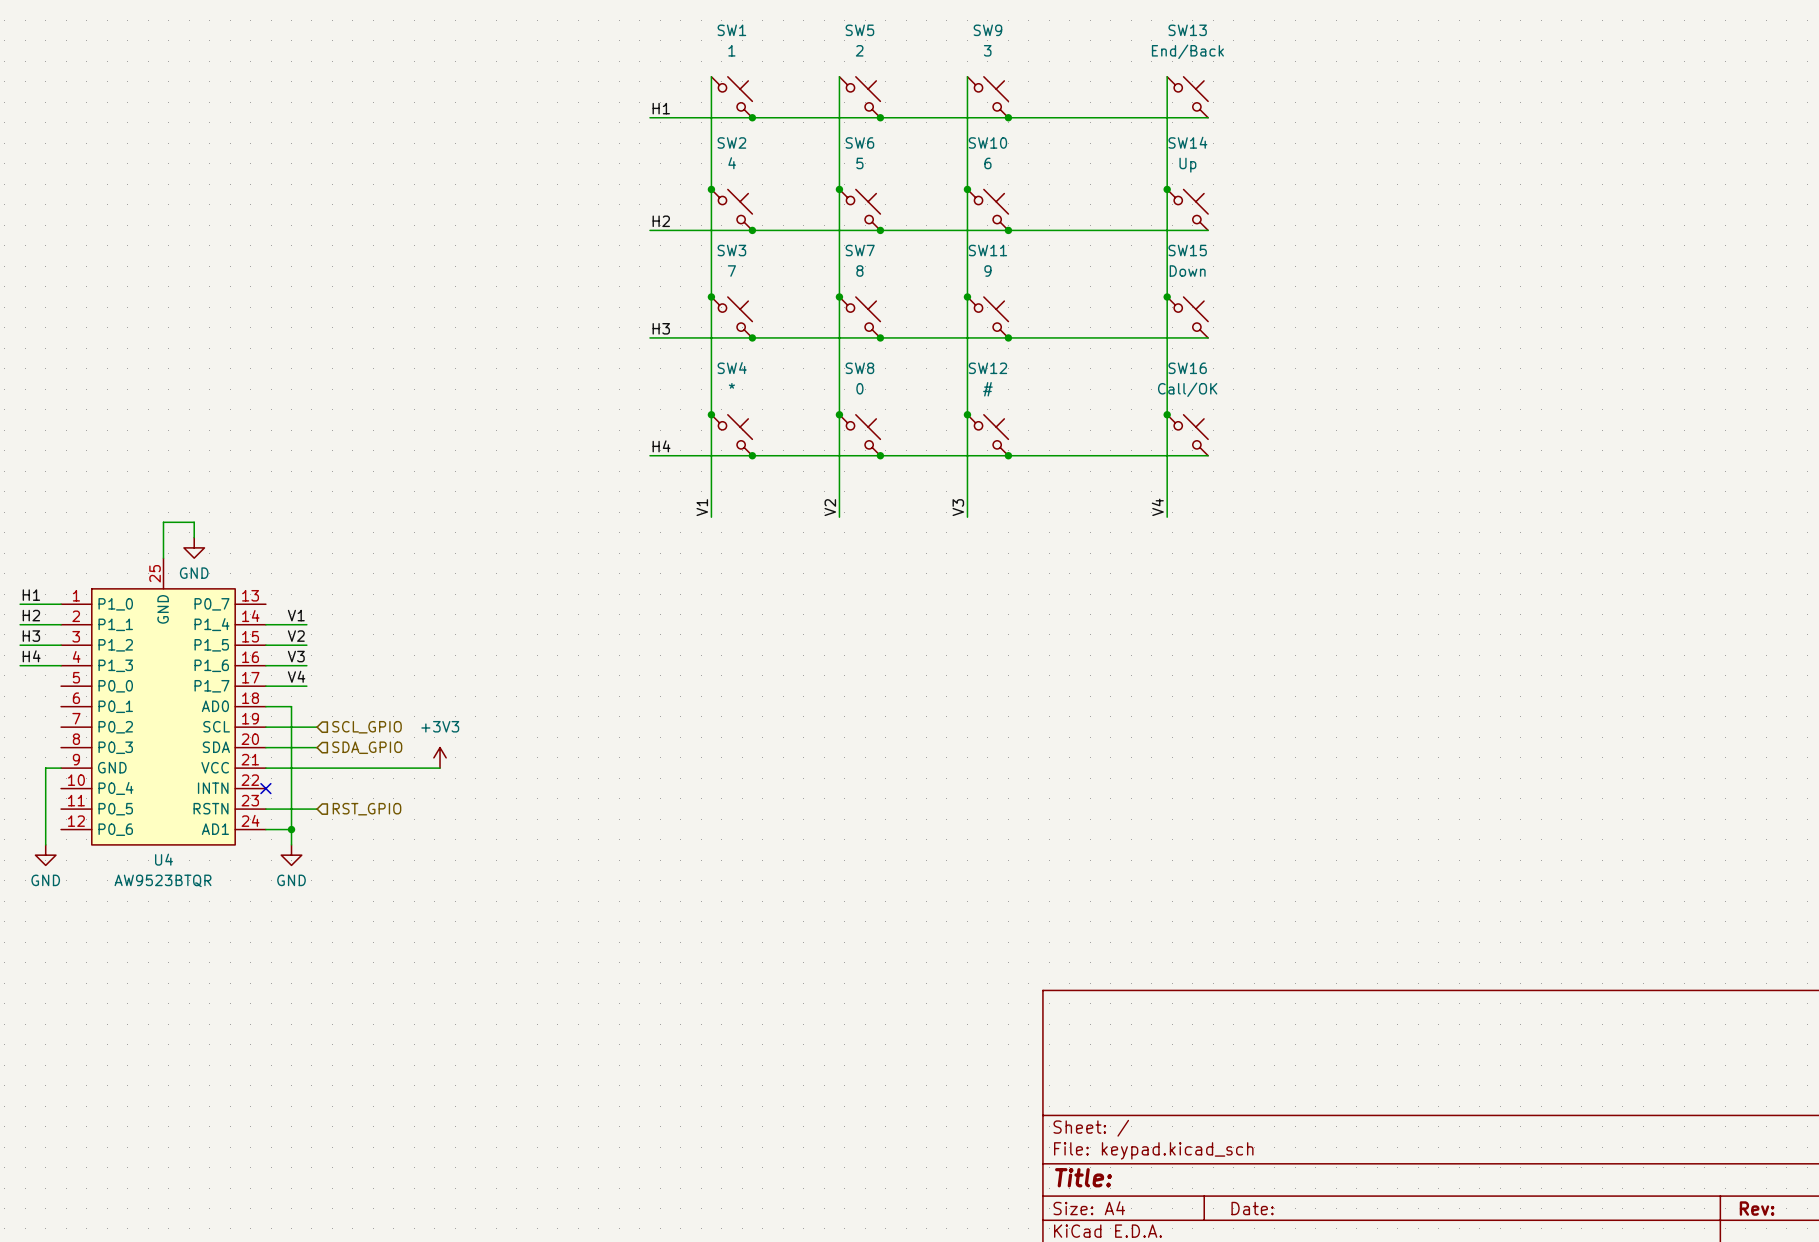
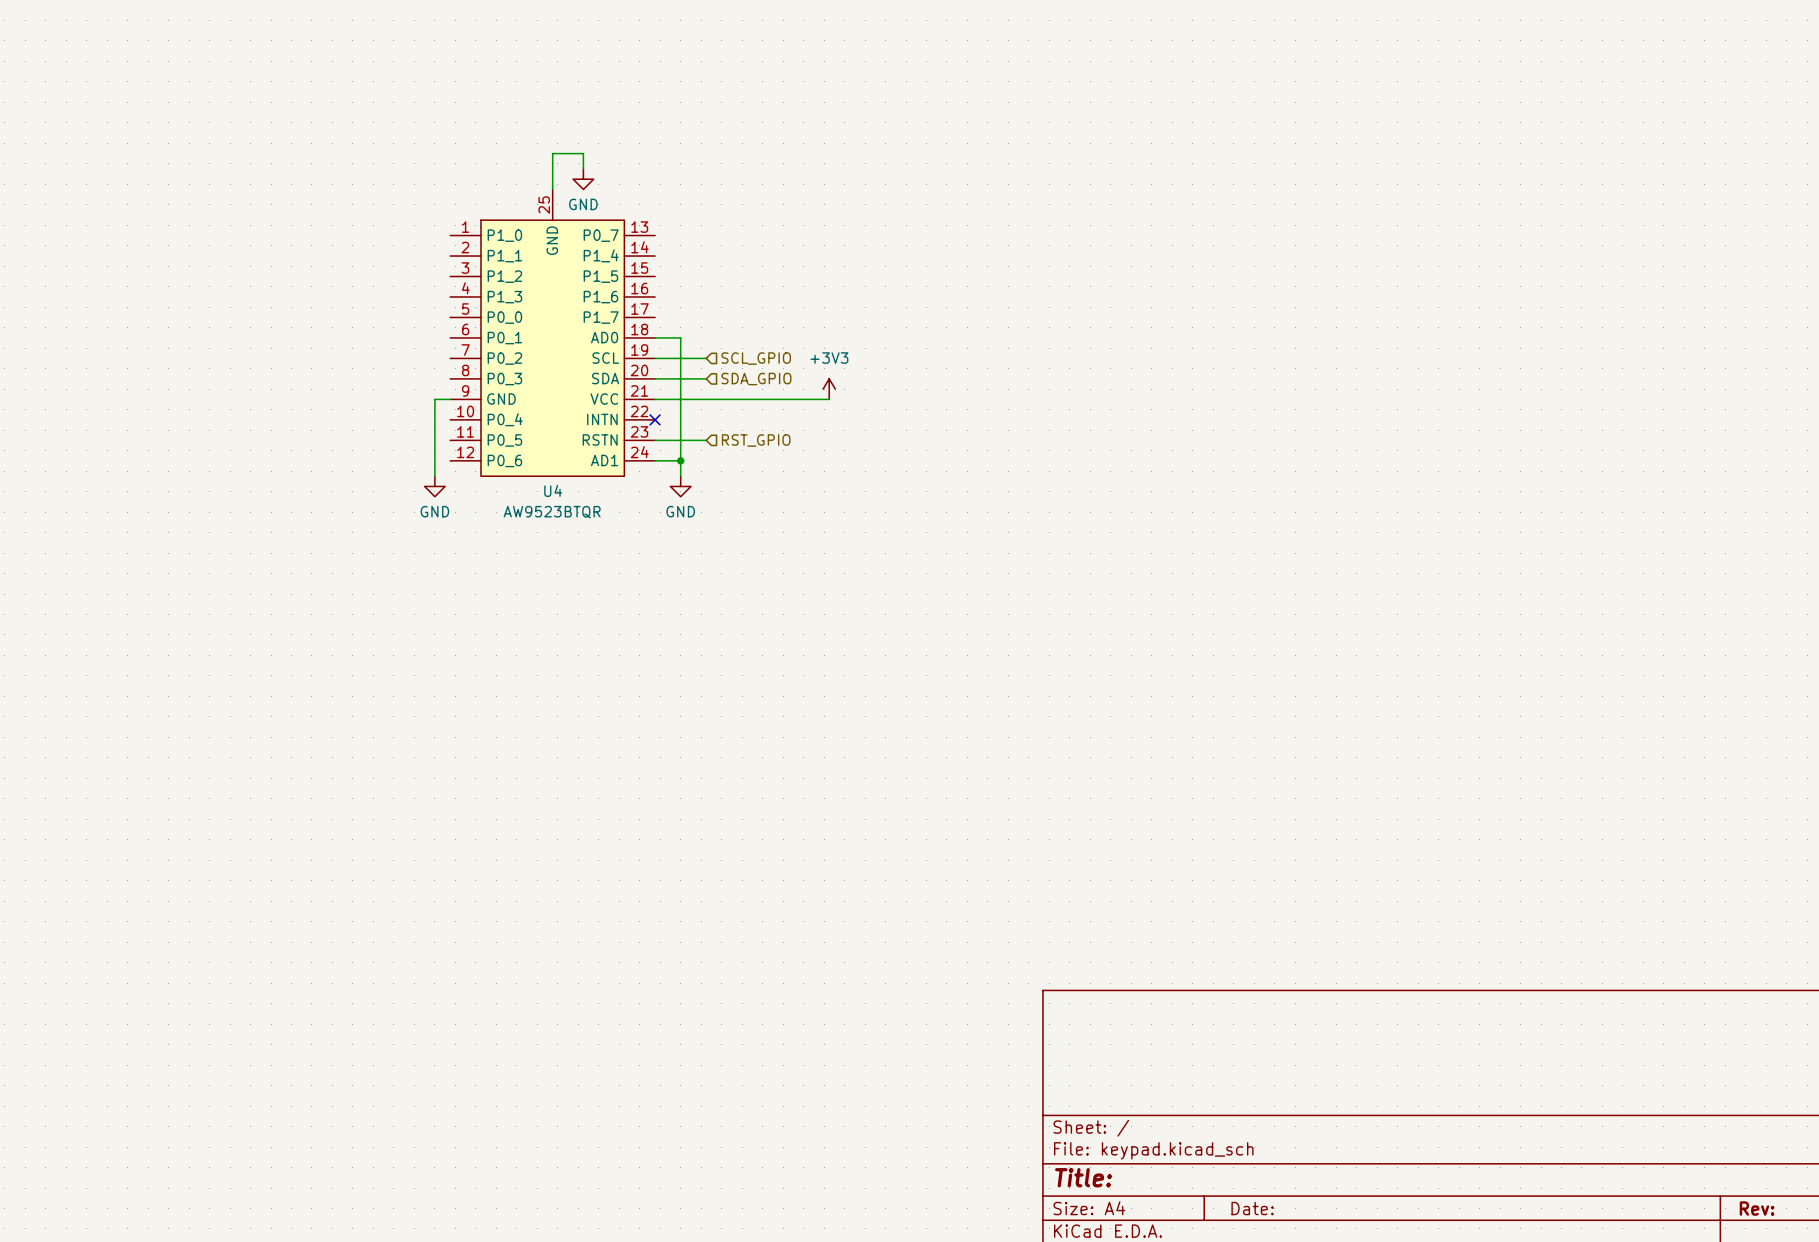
wire: (711, 76) (711, 517) -> none
wire: (839, 76) (839, 517) -> none
wire: (967, 76) (967, 517) -> none
wire: (1167, 76) (1167, 517) -> none
SW1: 1 (731, 97) -> none
SW5: 2 (859, 97) -> none
SW9: 3 (987, 97) -> none
SW13: End/Back (1187, 97) -> none
label: H1 (661, 108) -> none
wire: (649, 117) (1208, 117) -> none
junction: (752, 117) -> none
junction: (880, 117) -> none
junction: (1008, 117) -> none
wire: none -> (583, 168) (583, 153) (552, 153) (552, 189)
power symbol: none -> GND (583, 179)
junction: (711, 189) -> none
junction: (839, 189) -> none
junction: (967, 189) -> none
junction: (1167, 189) -> none
SW2: 4 (731, 209) -> none
SW6: 5 (859, 209) -> none
SW10: 6 (987, 209) -> none
SW14: Up (1187, 209) -> none
label: H2 (661, 221) -> none
wire: (649, 230) (1208, 230) -> none
junction: (752, 230) -> none
junction: (880, 230) -> none
junction: (1008, 230) -> none
junction: (711, 296) -> none
junction: (839, 296) -> none
junction: (967, 296) -> none
junction: (1167, 296) -> none
SW3: 7 (731, 317) -> none
SW7: 8 (859, 317) -> none
SW11: 9 (987, 317) -> none
SW15: Down (1187, 317) -> none
label: H3 (661, 328) -> none
wire: (680, 337) (1208, 337) -> (680, 337) (680, 476)
junction: (752, 337) -> none
junction: (880, 337) -> none
junction: (1008, 337) -> none
wire: none -> (655, 358) (706, 358)
hierarchical label: none -> SCL_GPIO (756, 358)
wire: none -> (655, 378) (706, 378)
hierarchical label: none -> SDA_GPIO (756, 379)
power symbol: none -> +3V3 (829, 389)
wire: none -> (450, 399) (434, 399) (434, 476)
wire: none -> (655, 399) (829, 399)
junction: (711, 414) -> none
junction: (839, 414) -> none
junction: (967, 414) -> none
junction: (1167, 414) -> none
no-connect mark: none -> (655, 419)
SW4: * (731, 435) -> none
SW8: 0 (859, 435) -> none
SW12: # (987, 435) -> none
SW16: Call/OK (1187, 435) -> none
wire: none -> (655, 440) (706, 440)
hierarchical label: none -> RST_GPIO (756, 440)
label: H4 (661, 446) -> none
wire: (649, 455) (1208, 455) -> none
junction: (752, 455) -> none
junction: (880, 455) -> none
junction: (1008, 455) -> none
wire: none -> (655, 460) (680, 460)
junction: none -> (680, 460)
power symbol: none -> GND (434, 486)
power symbol: none -> GND (680, 486)
label: V1 (702, 507) -> none
label: V2 (830, 507) -> none
label: V3 (958, 507) -> none
label: V4 (1157, 507) -> none
wire: (194, 537) (194, 522) (163, 522) (163, 558) -> none
power symbol: GND (194, 547) -> none
label: H1 (31, 595) -> none
wire: (20, 604) (61, 604) -> none
label: H2 (31, 615) -> none
label: V1 (296, 615) -> none
wire: (20, 624) (61, 624) -> none
wire: (265, 624) (306, 624) -> none
label: H3 (31, 636) -> none
label: V2 (296, 636) -> none
wire: (20, 645) (61, 645) -> none
wire: (265, 645) (306, 645) -> none
label: H4 (31, 656) -> none
label: V3 (296, 656) -> none
wire: (20, 665) (61, 665) -> none
wire: (265, 665) (306, 665) -> none
label: V4 (296, 676) -> none
wire: (265, 686) (306, 686) -> none
U4 position: (163, 701) -> (552, 332)
wire: (265, 706) (291, 706) (291, 844) -> none
wire: (265, 727) (317, 727) -> none
hierarchical label: SCL_GPIO (367, 727) -> none
wire: (265, 747) (317, 747) -> none
hierarchical label: SDA_GPIO (367, 747) -> none
power symbol: +3V3 (440, 757) -> none
wire: (61, 768) (45, 768) (45, 844) -> none
wire: (265, 768) (440, 768) -> none
no-connect mark: (265, 788) -> none
wire: (265, 809) (317, 809) -> none
hierarchical label: RST_GPIO (367, 809) -> none
wire: (265, 829) (291, 829) -> none
junction: (291, 829) -> none
power symbol: GND (45, 855) -> none
power symbol: GND (291, 855) -> none

